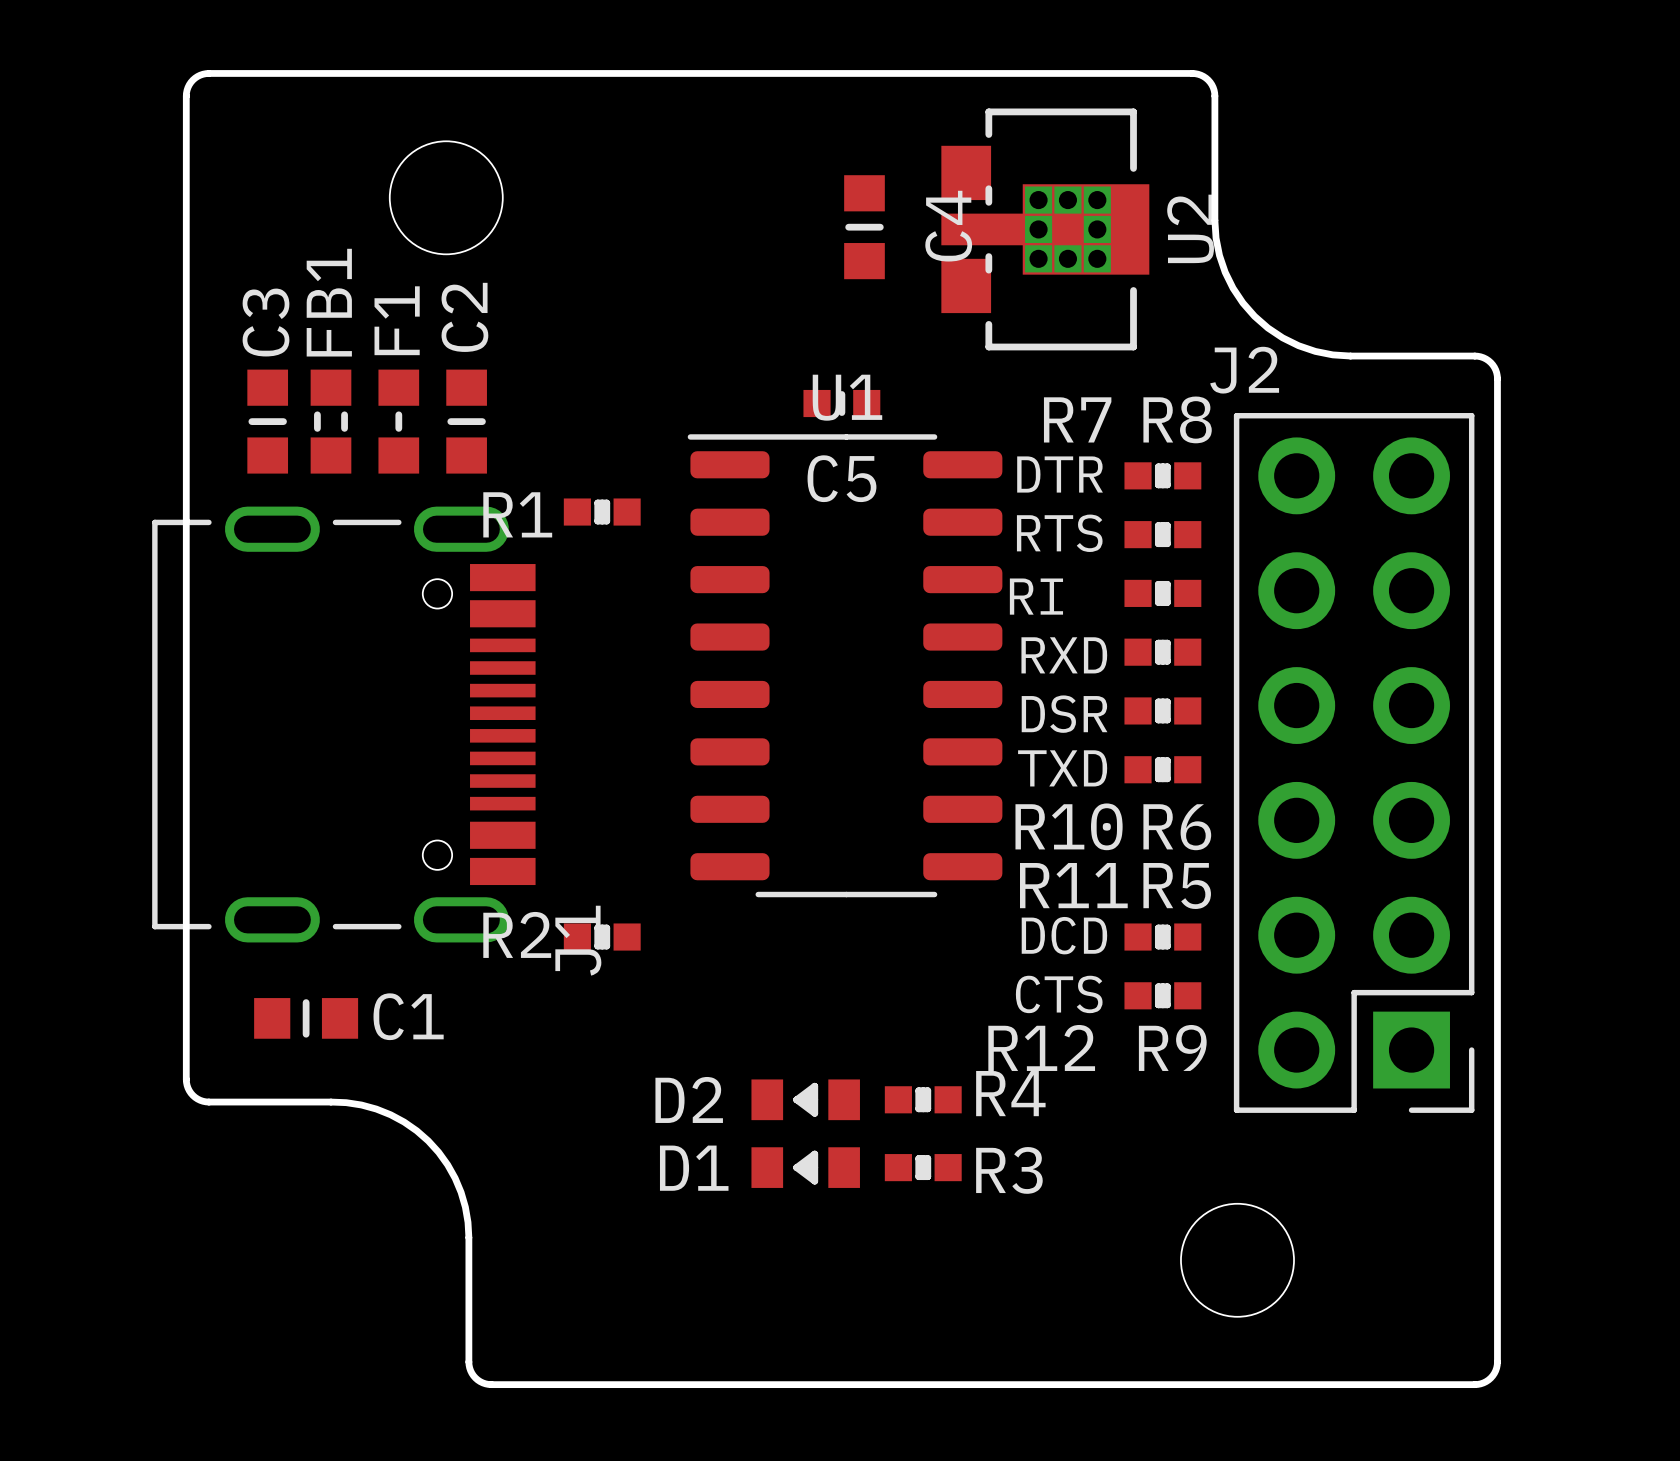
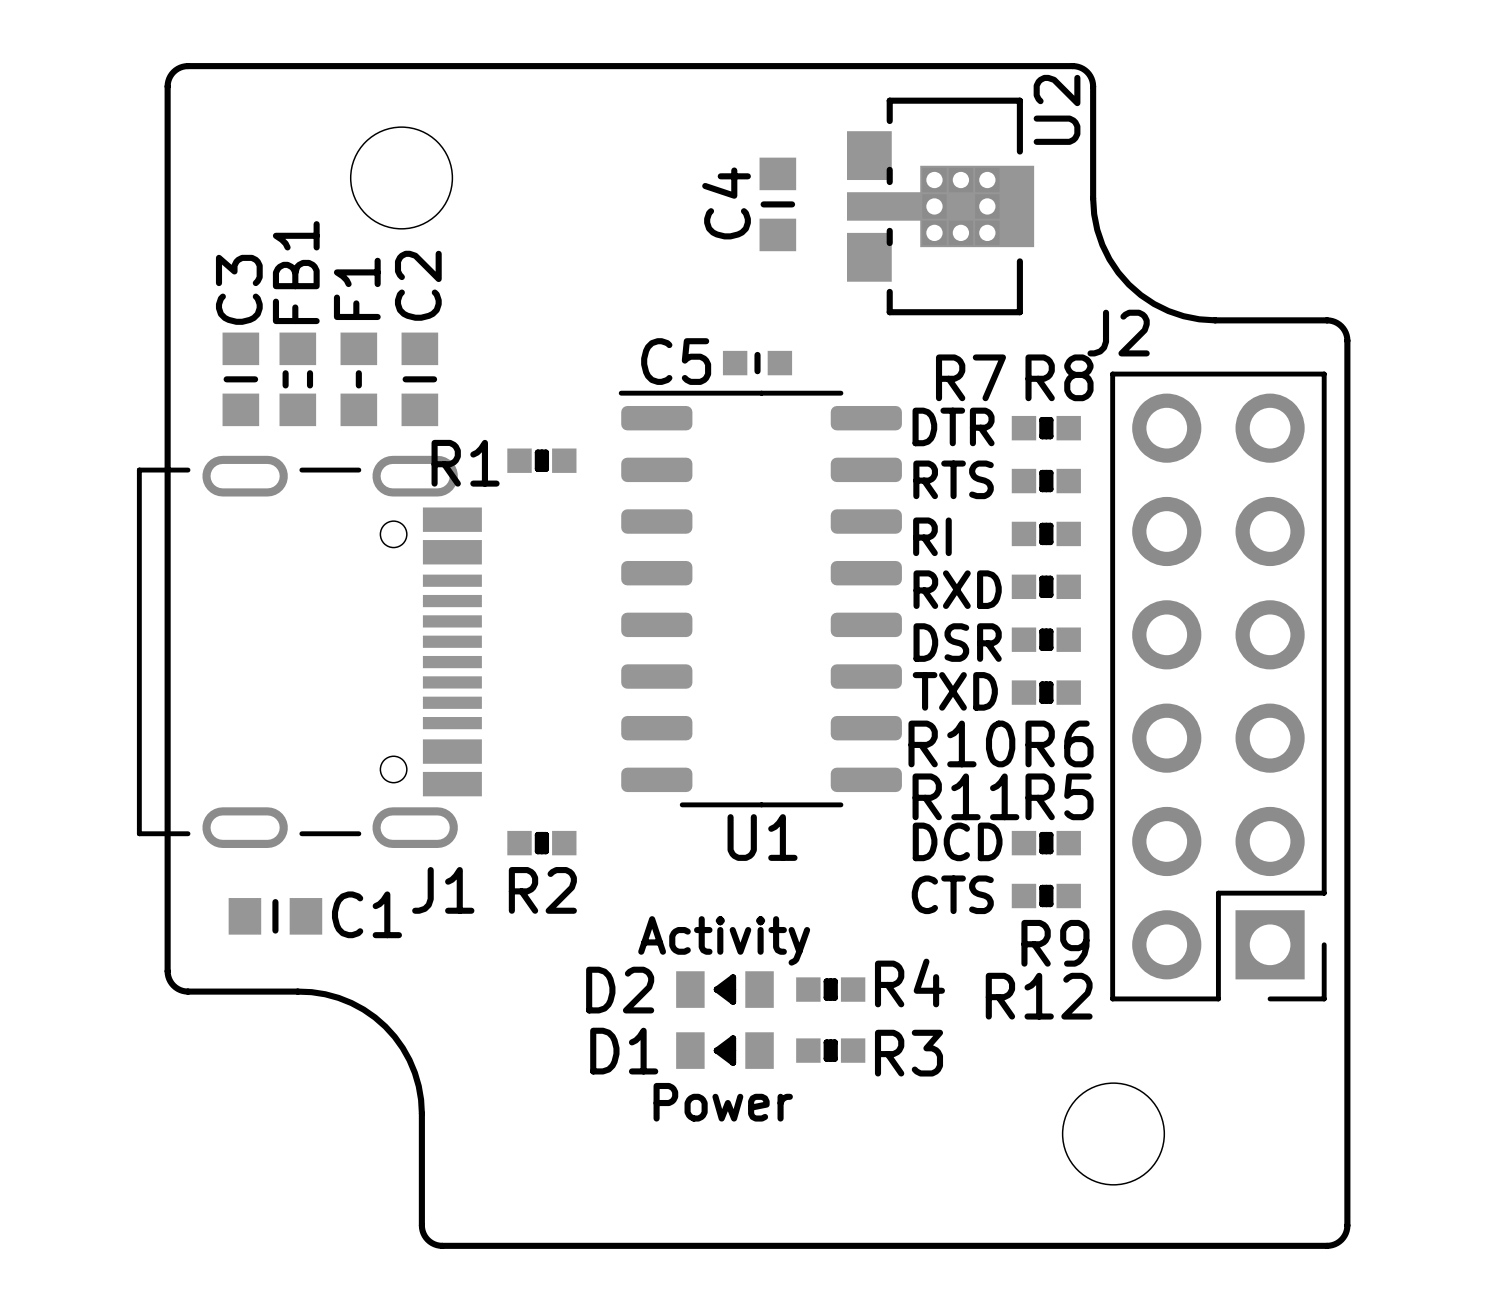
C4 name position: C4 (948, 226) -> C4 (726, 203)
U2 name position: U2 (1190, 228) -> U2 (1057, 109)
U1 name position: U1 (847, 397) -> U1 (762, 837)
C5 name position: C5 (841, 478) -> C5 (676, 361)
R2 name position: R2 (517, 934) -> R2 (542, 890)
J1 name rotation: 0° (578, 940) -> 90° clockwise (443, 890)
text: none -> Activity (724, 940)
R12 name position: R12 (1041, 1047) -> R12 (1039, 996)
text: none -> Power (723, 1102)

